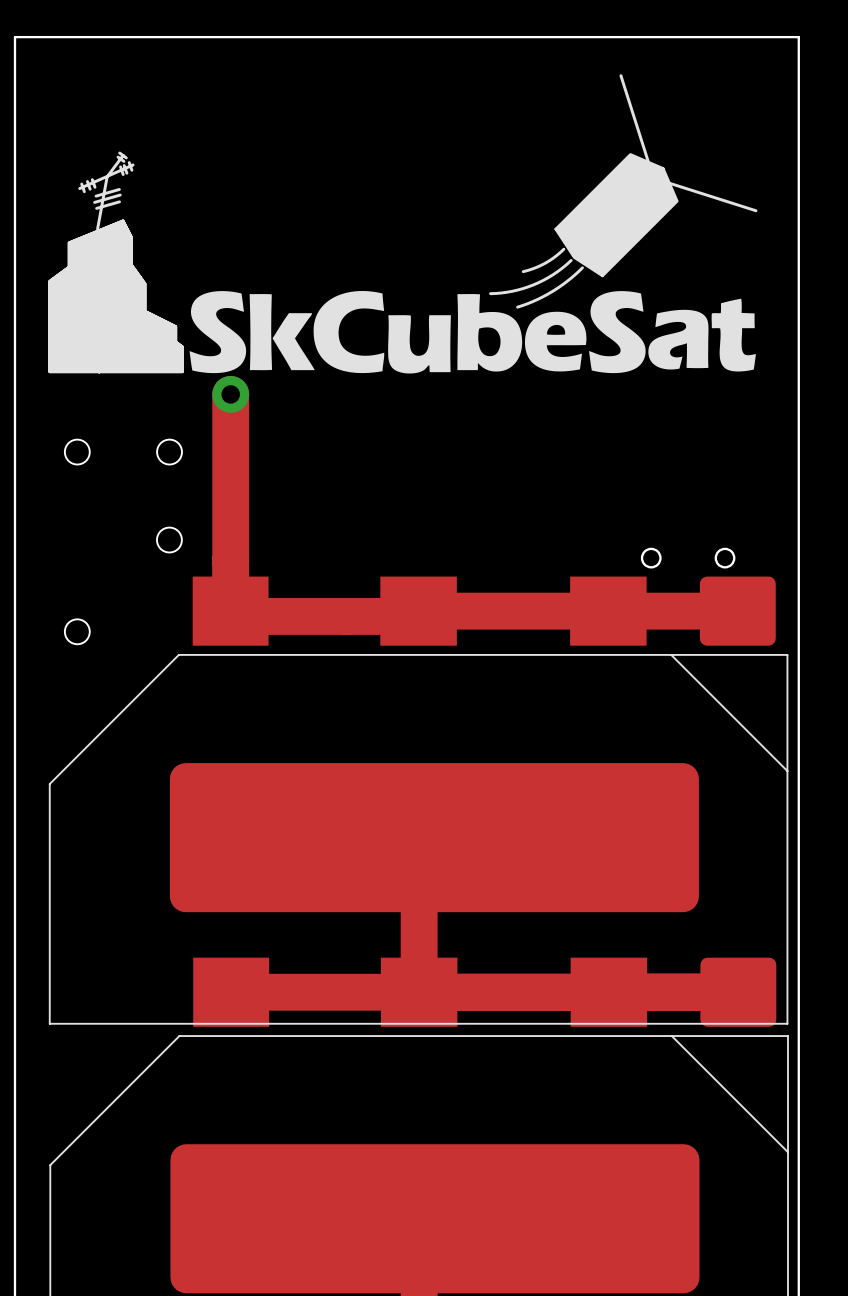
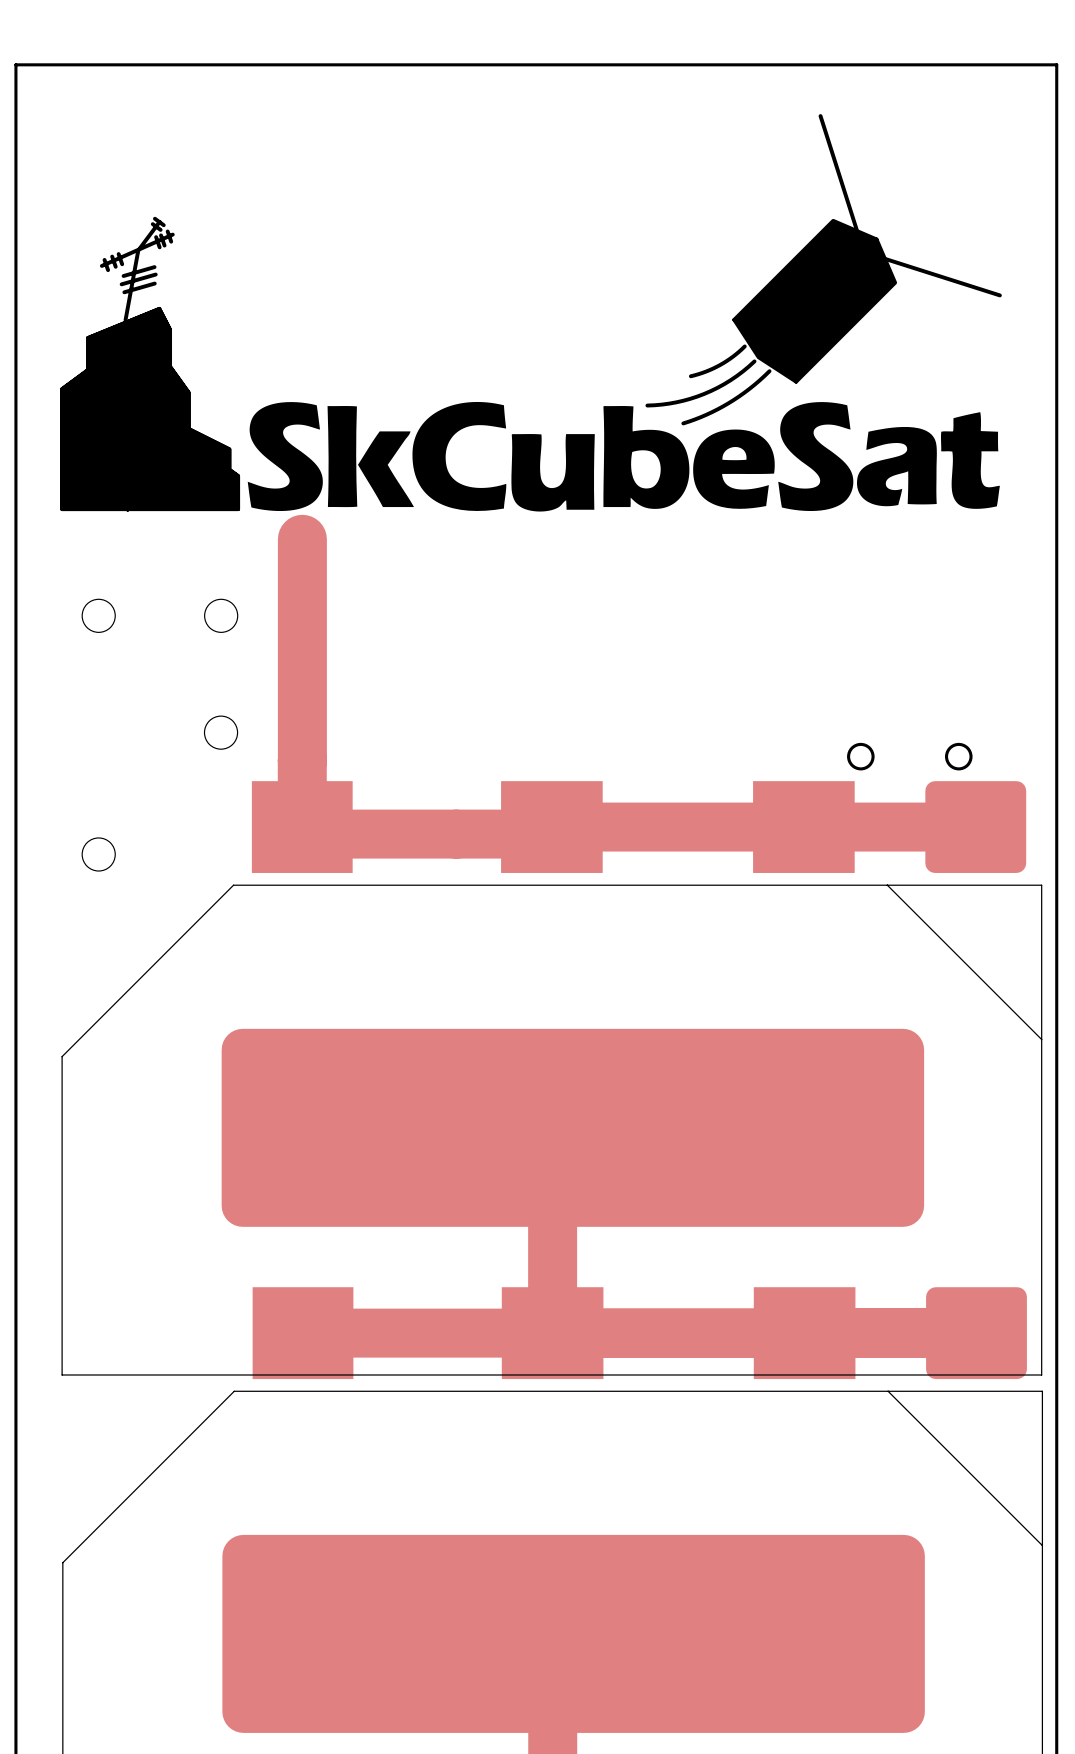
via: (230, 394) -> none

